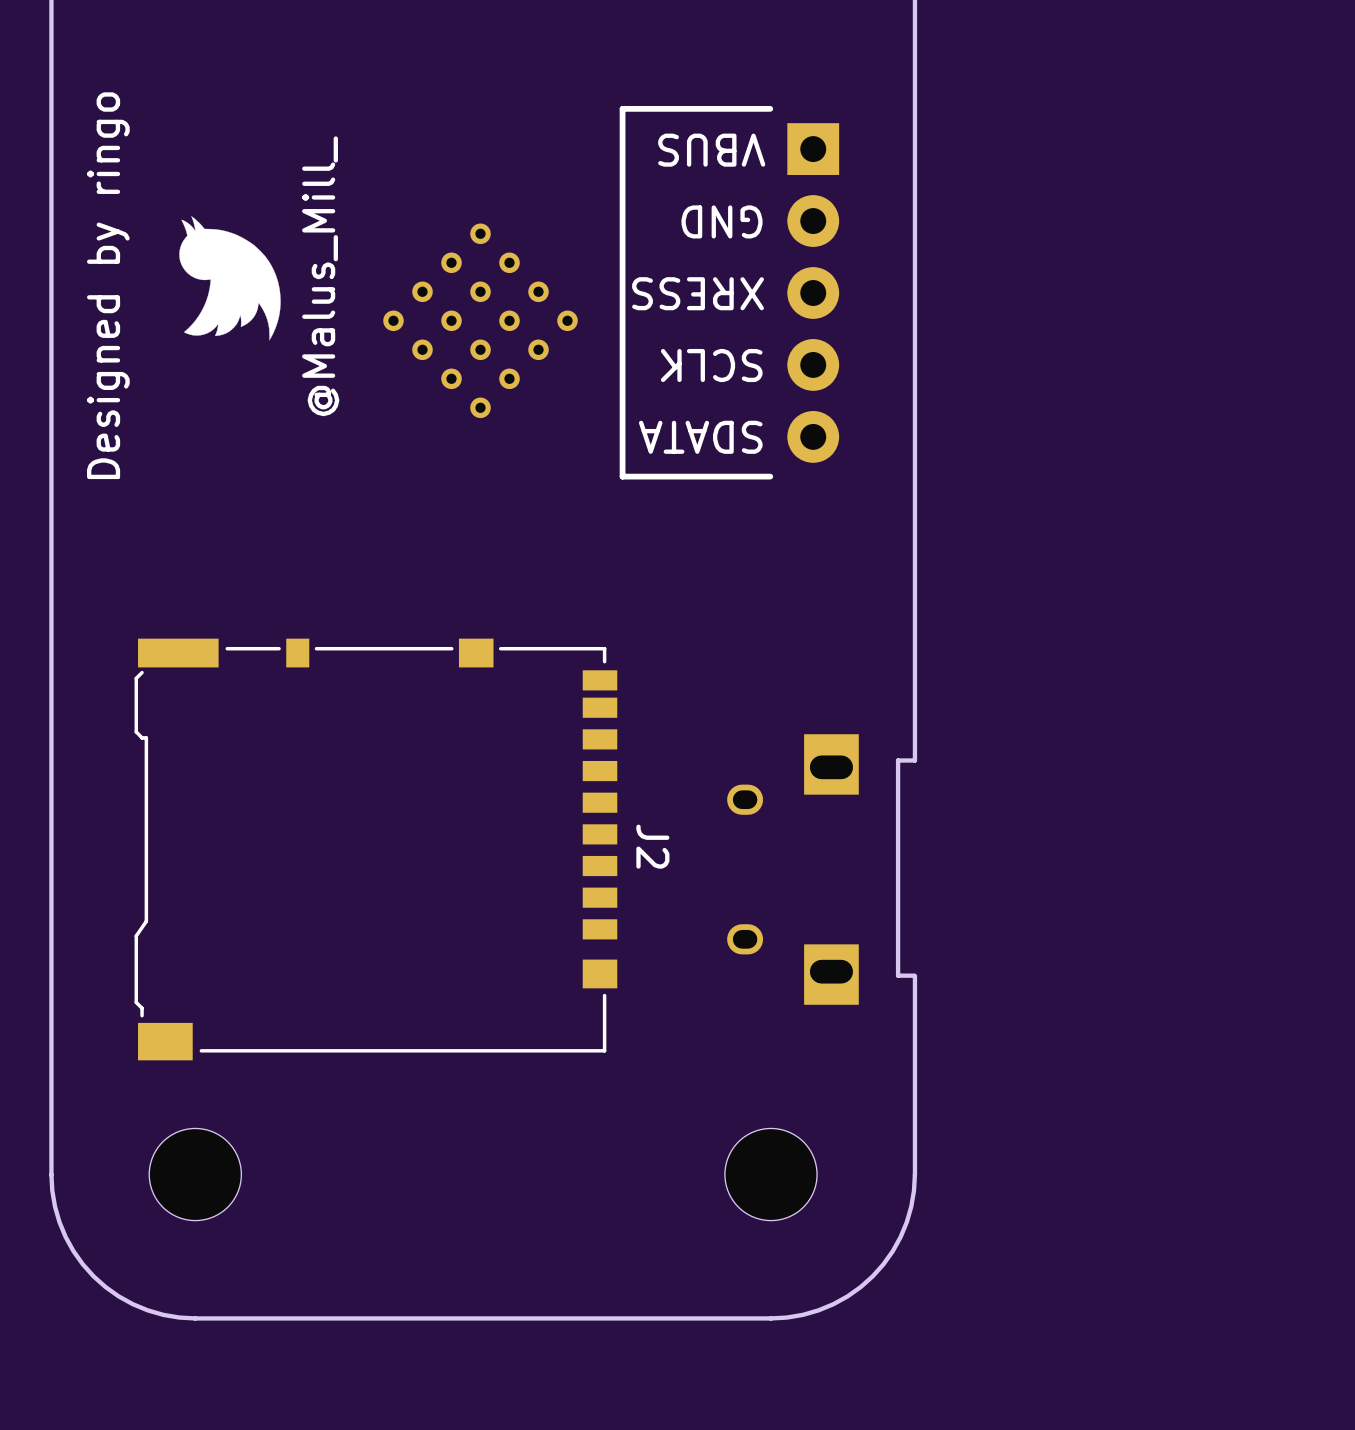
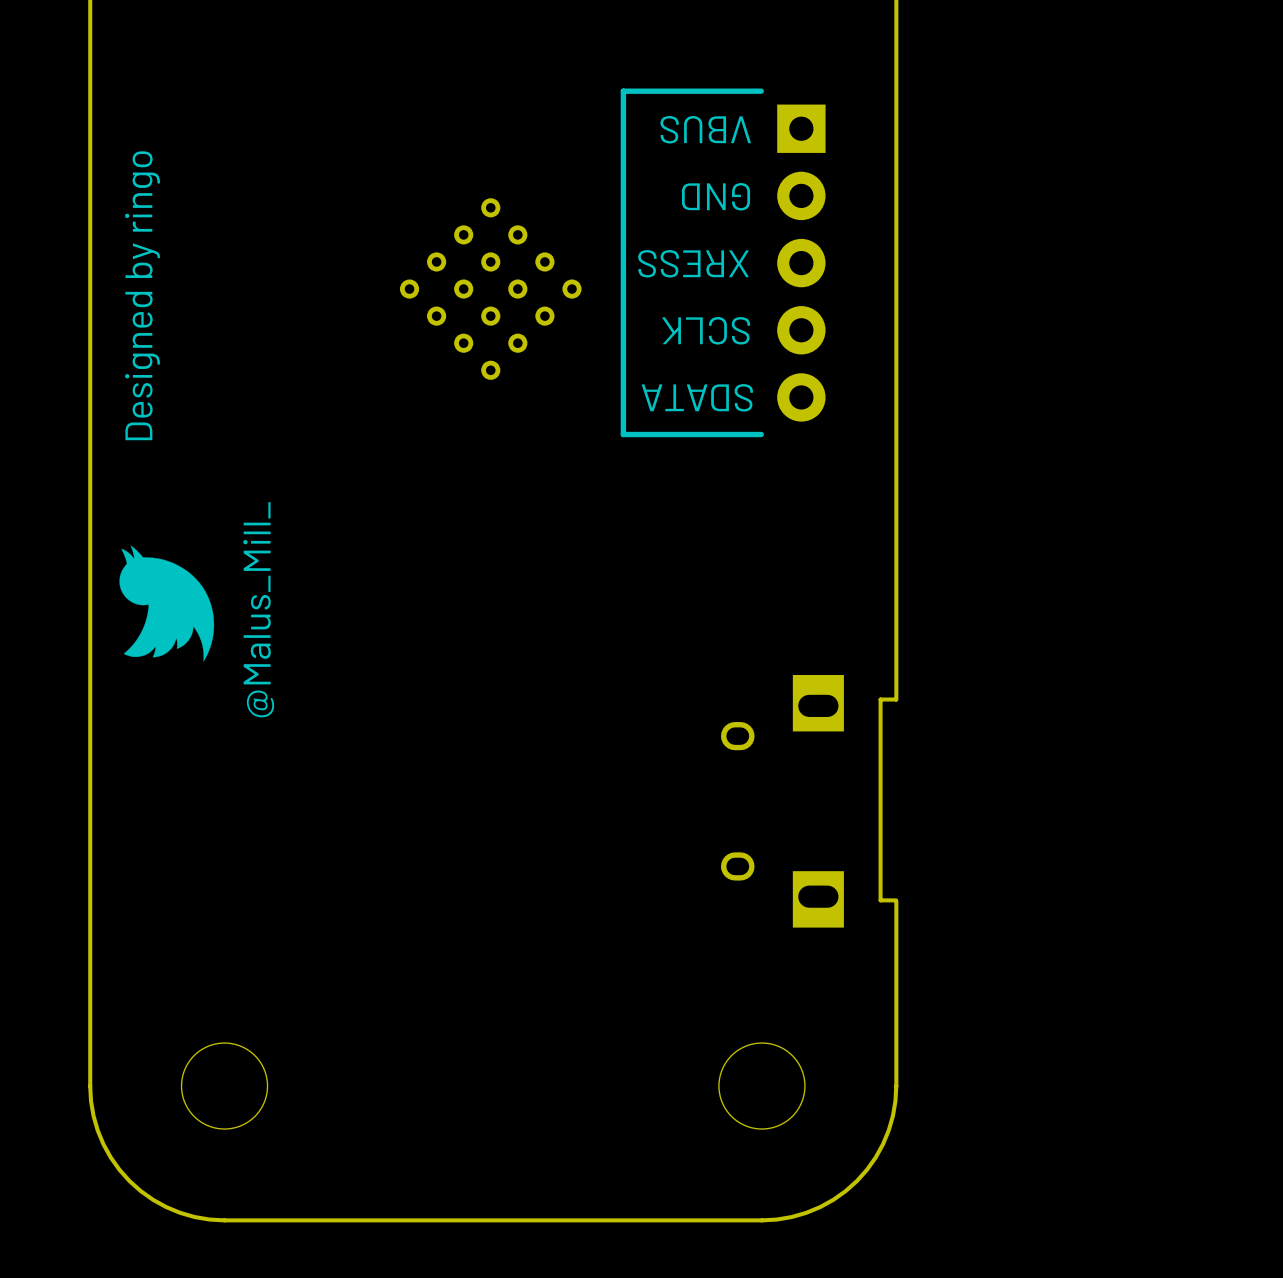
text position: @Malus_Mill_ (320, 276) -> @Malus_Mill_ (258, 609)
drawing position: (229, 278) -> (166, 603)
J2: (375, 849) -> none

